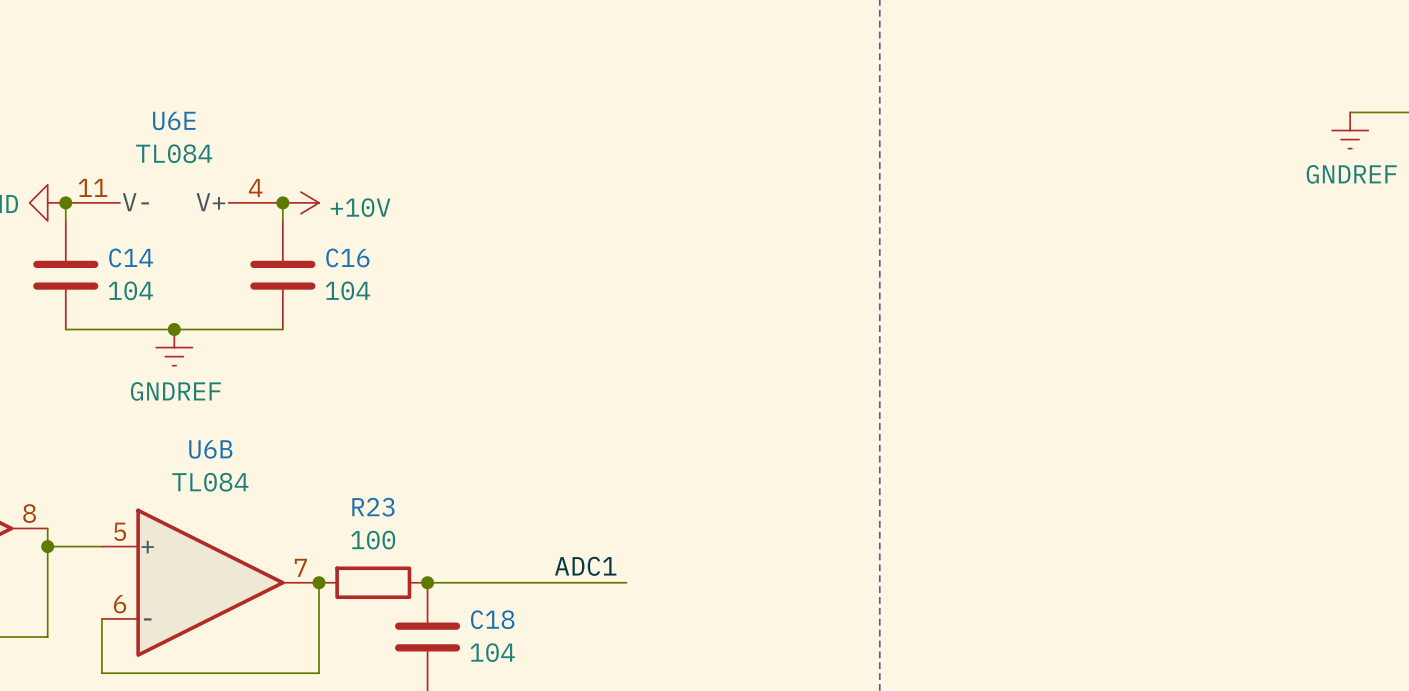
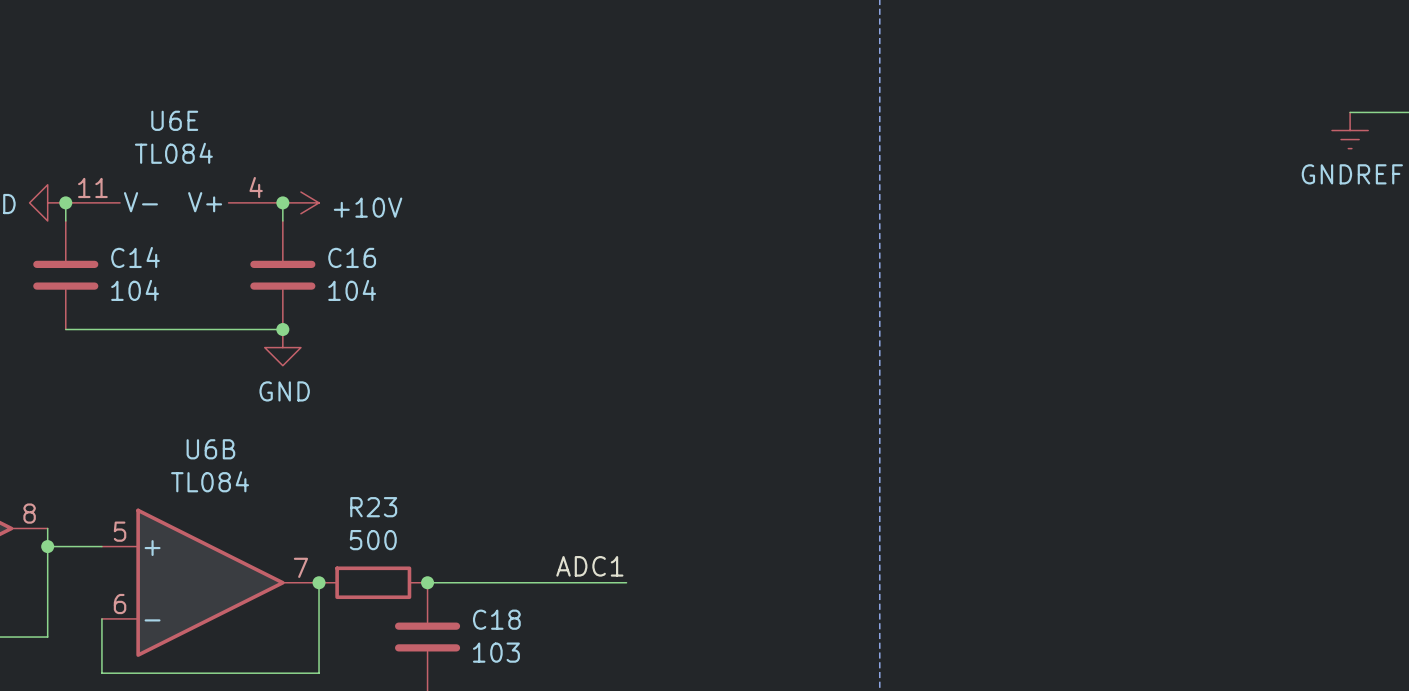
junction: (174, 329) -> none
junction: none -> (282, 329)
power symbol: GNDREF (174, 347) -> none
power symbol: none -> GND (282, 347)
R23 value: 100 (373, 540) -> 500 (373, 540)
C18 value: 104 (492, 652) -> 103 (496, 652)

